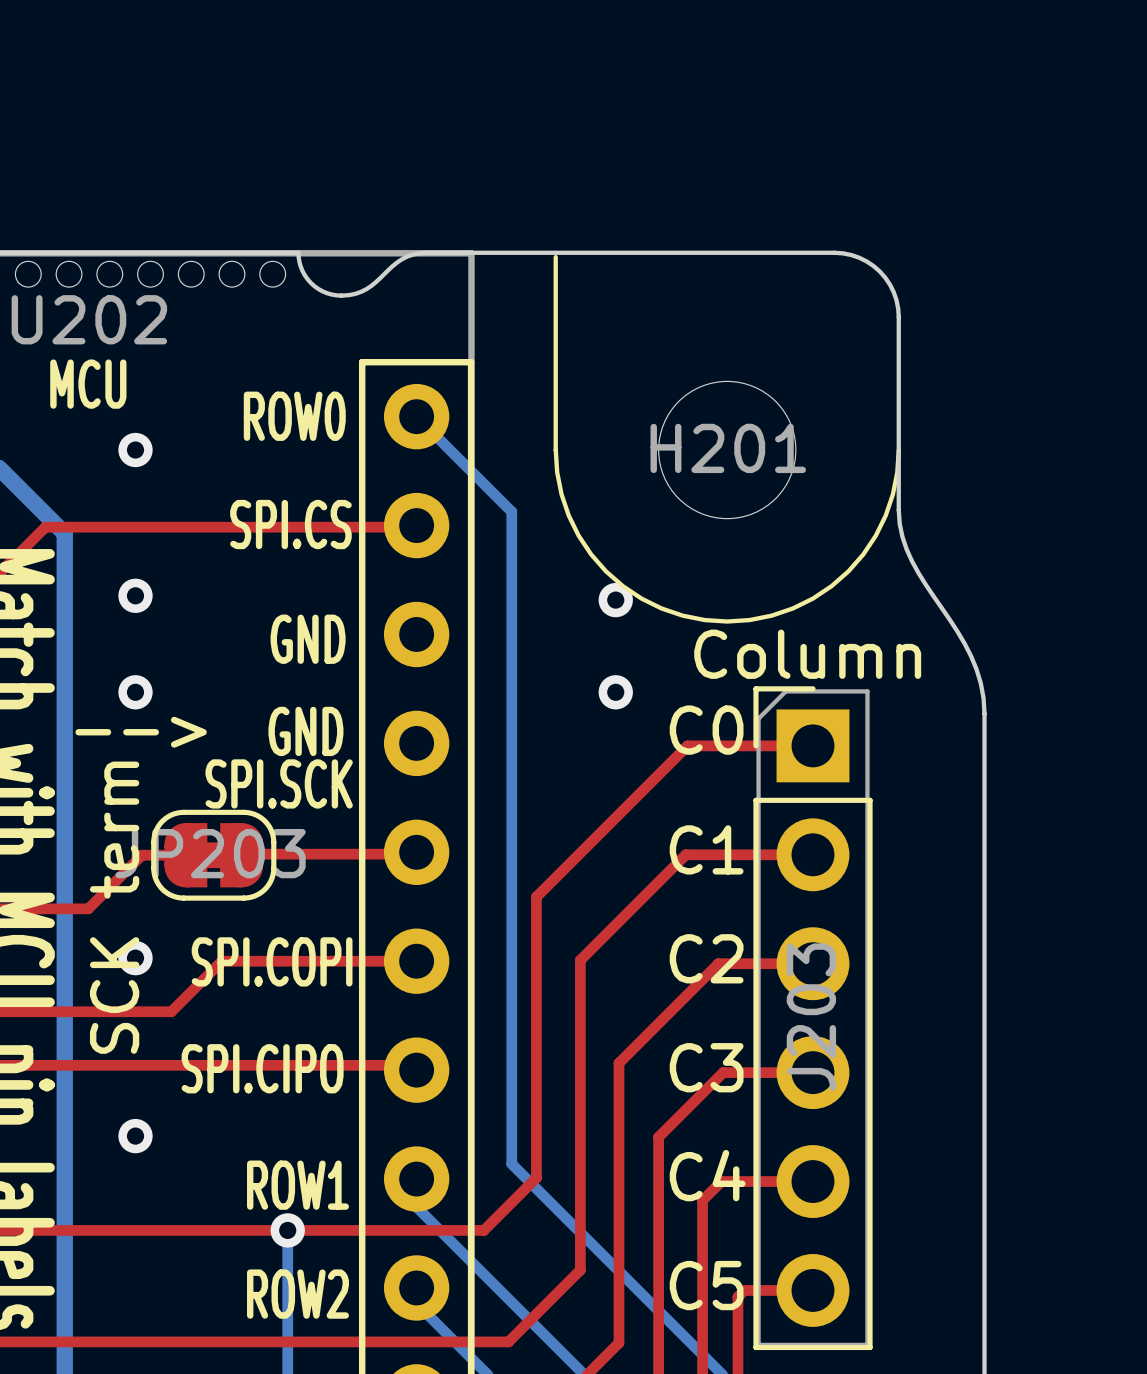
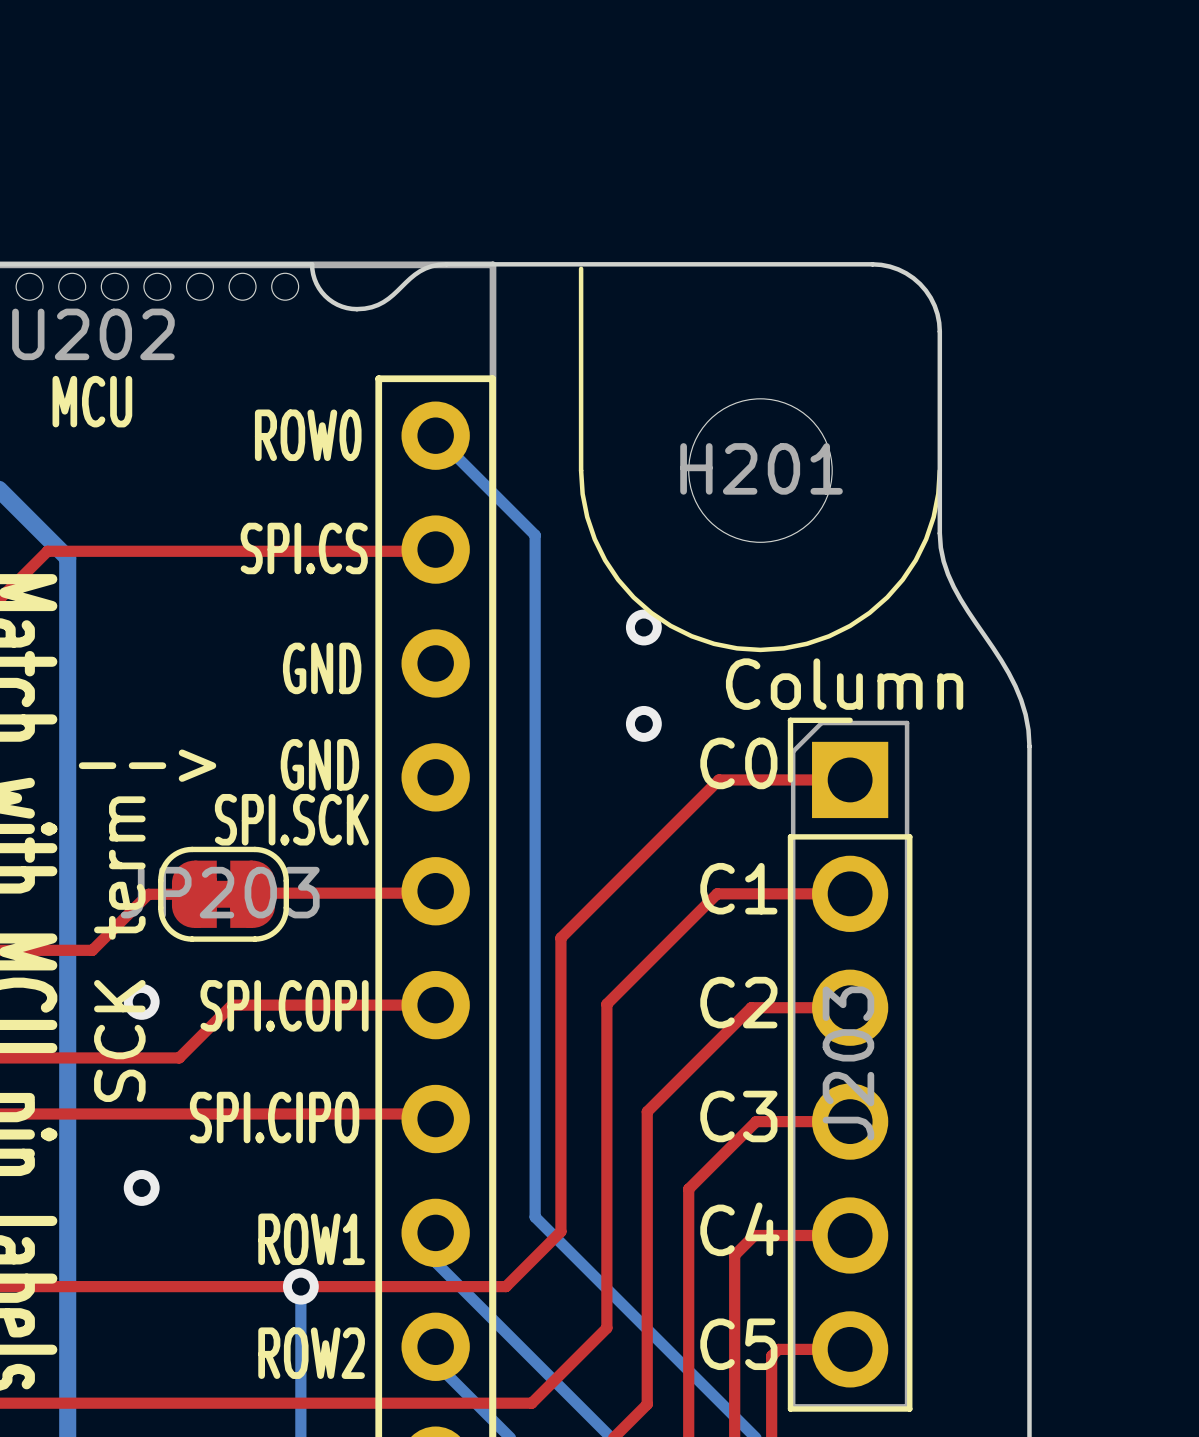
via: (135, 450) -> none
via: (135, 595) -> none
via: (135, 692) -> none

